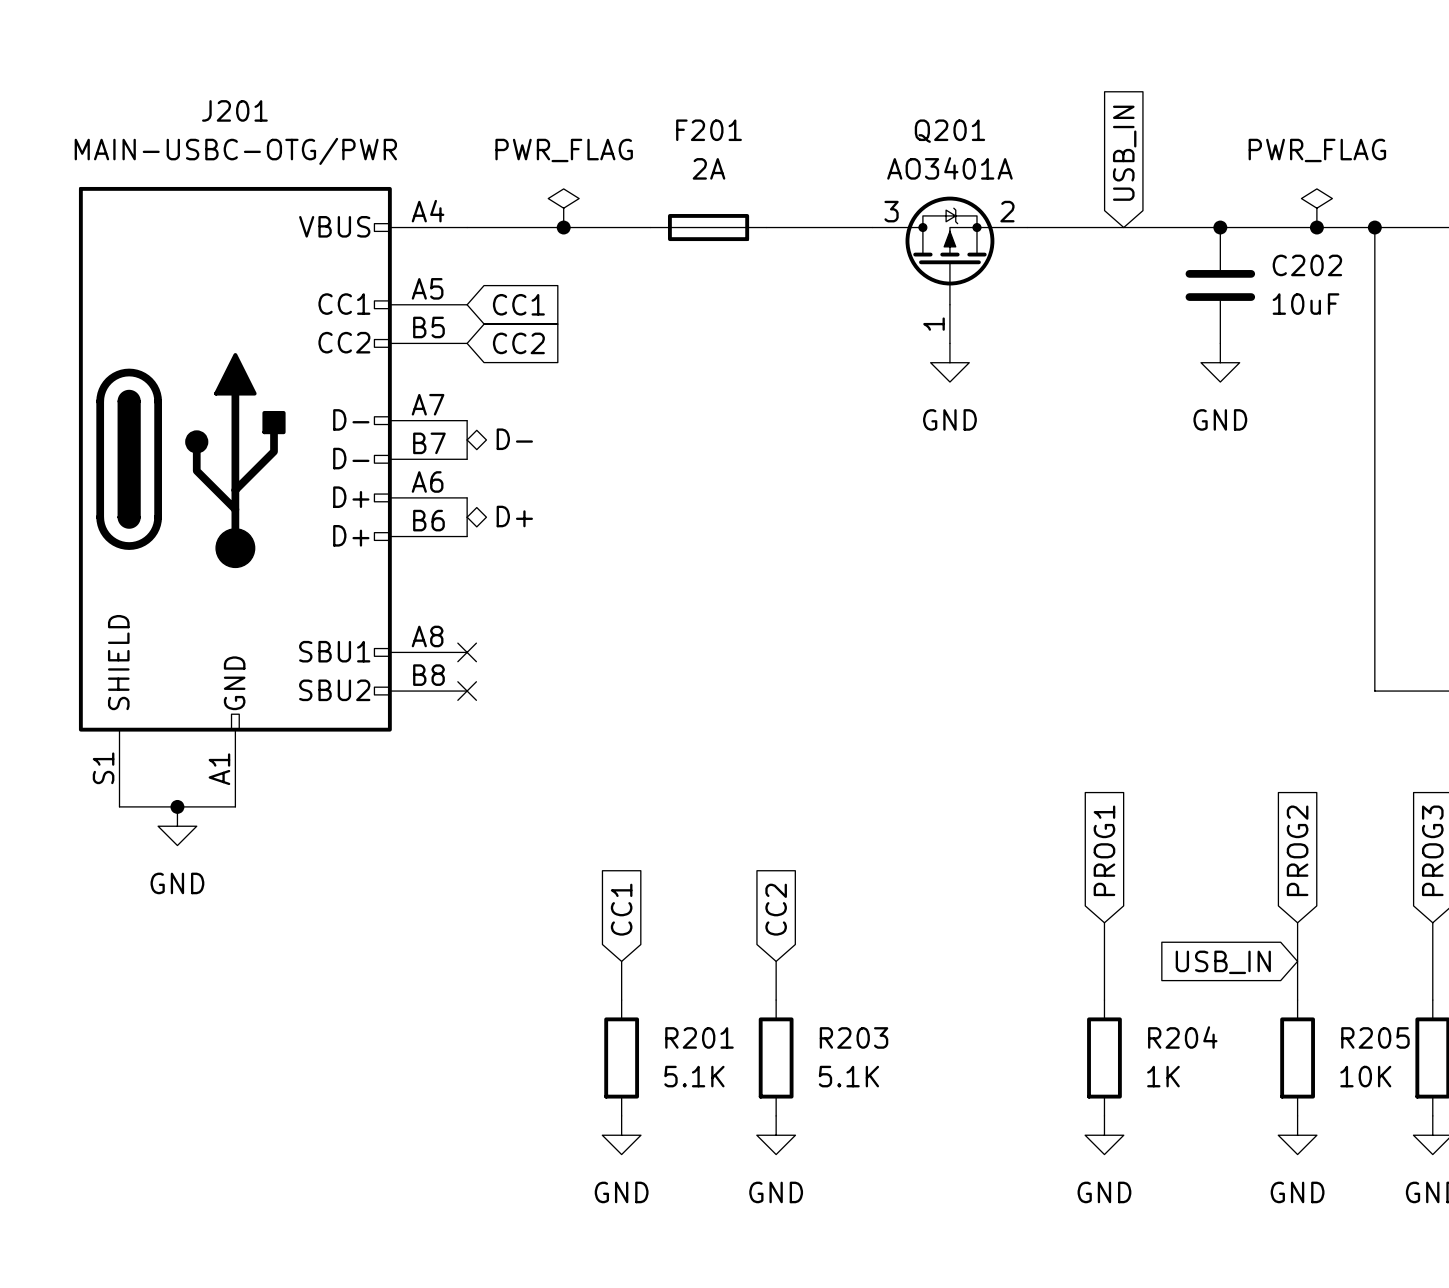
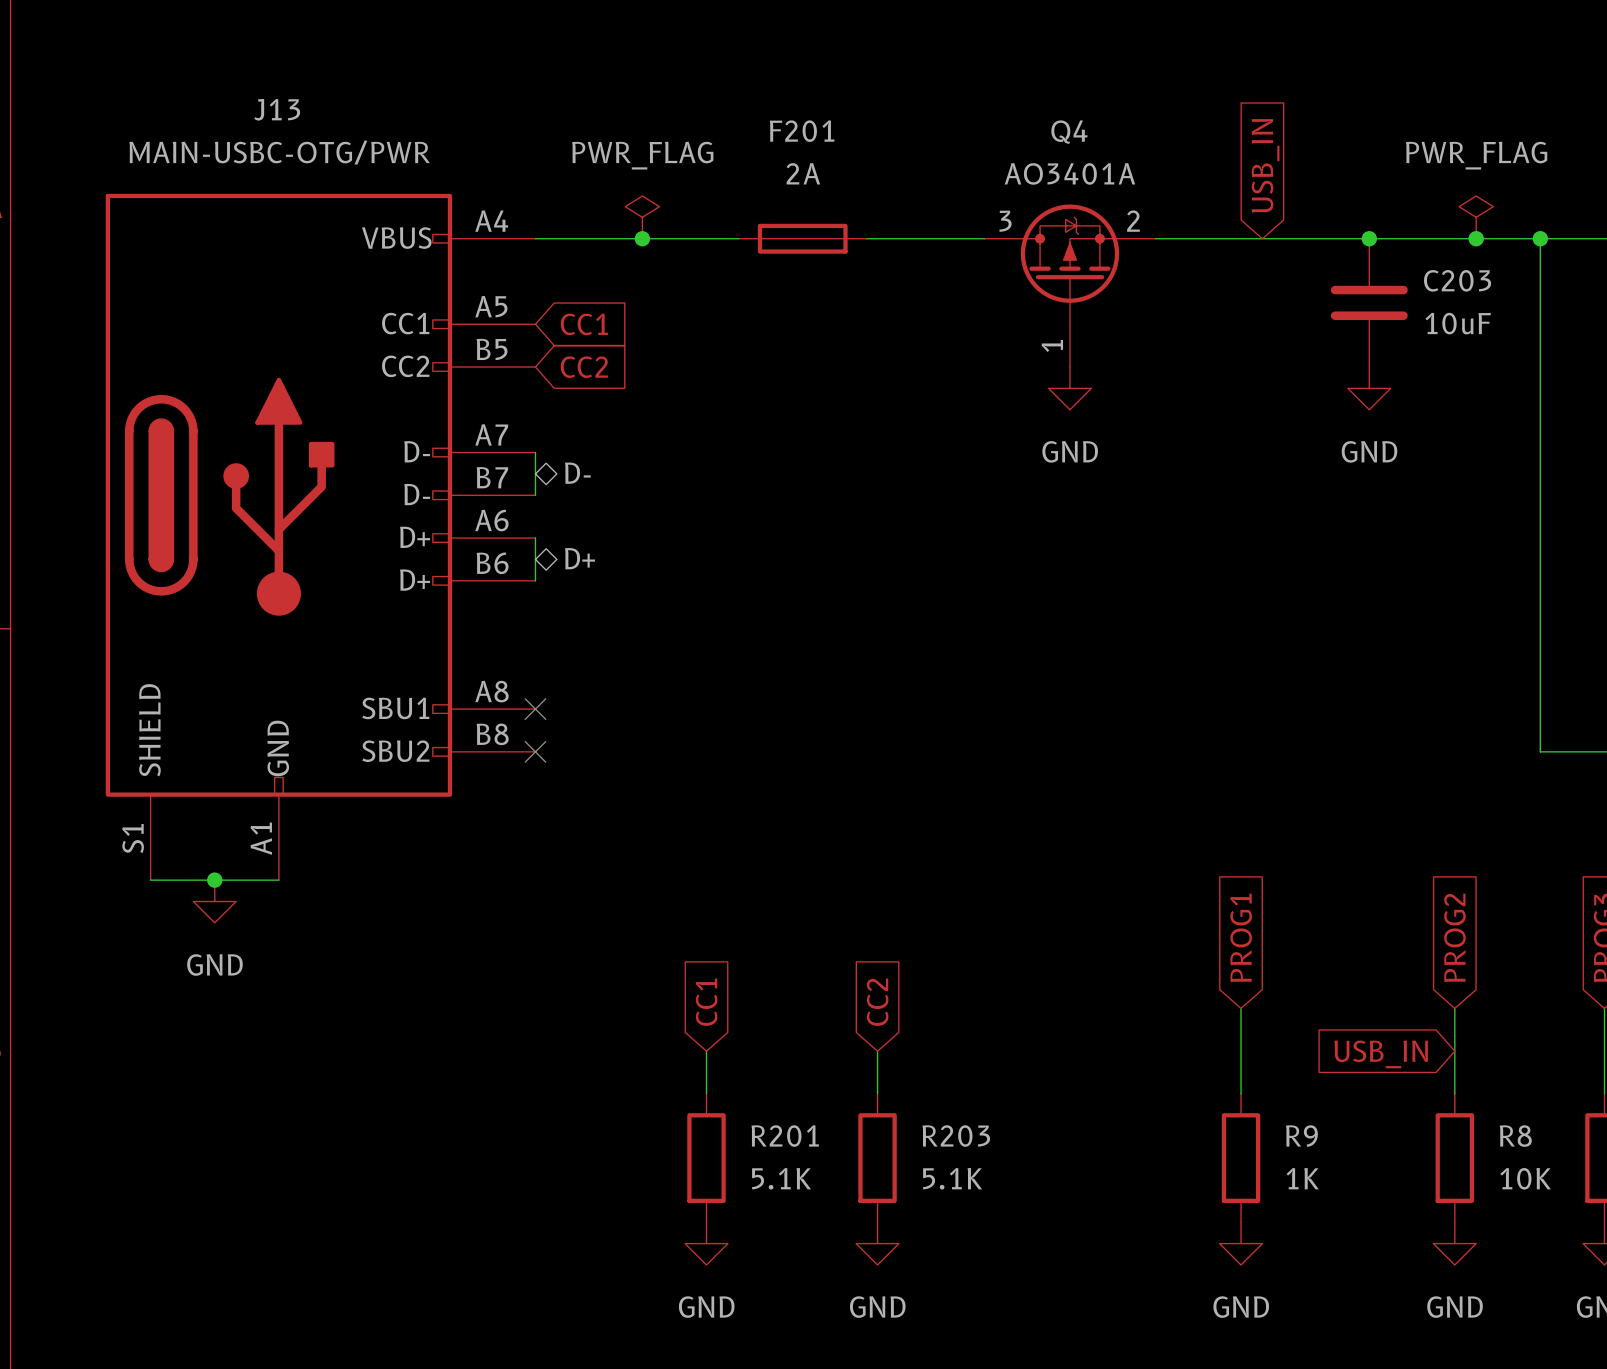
J201 name: J201 (234, 110) -> J13 (277, 109)
Q201 name: Q201 (949, 131) -> Q4 (1069, 132)
C202 name: C202 (1307, 265) -> C203 (1457, 280)
R204 name: R204 (1182, 1037) -> R9 (1301, 1136)
R205 name: R205 (1375, 1037) -> R8 (1515, 1136)

